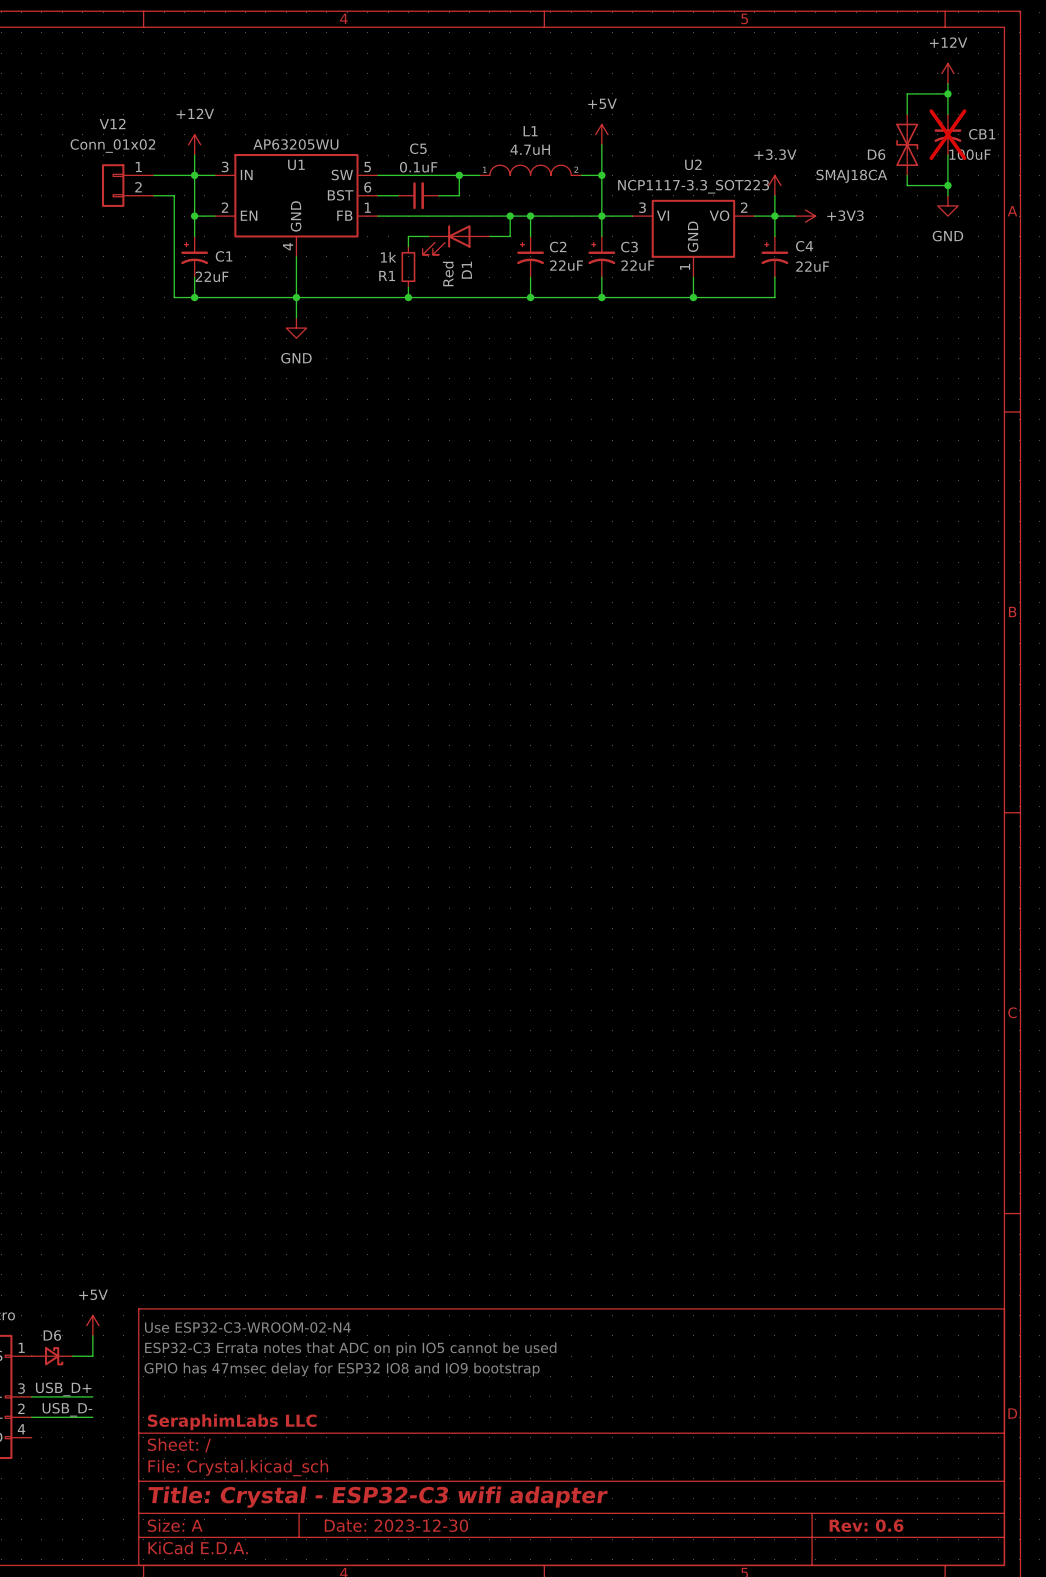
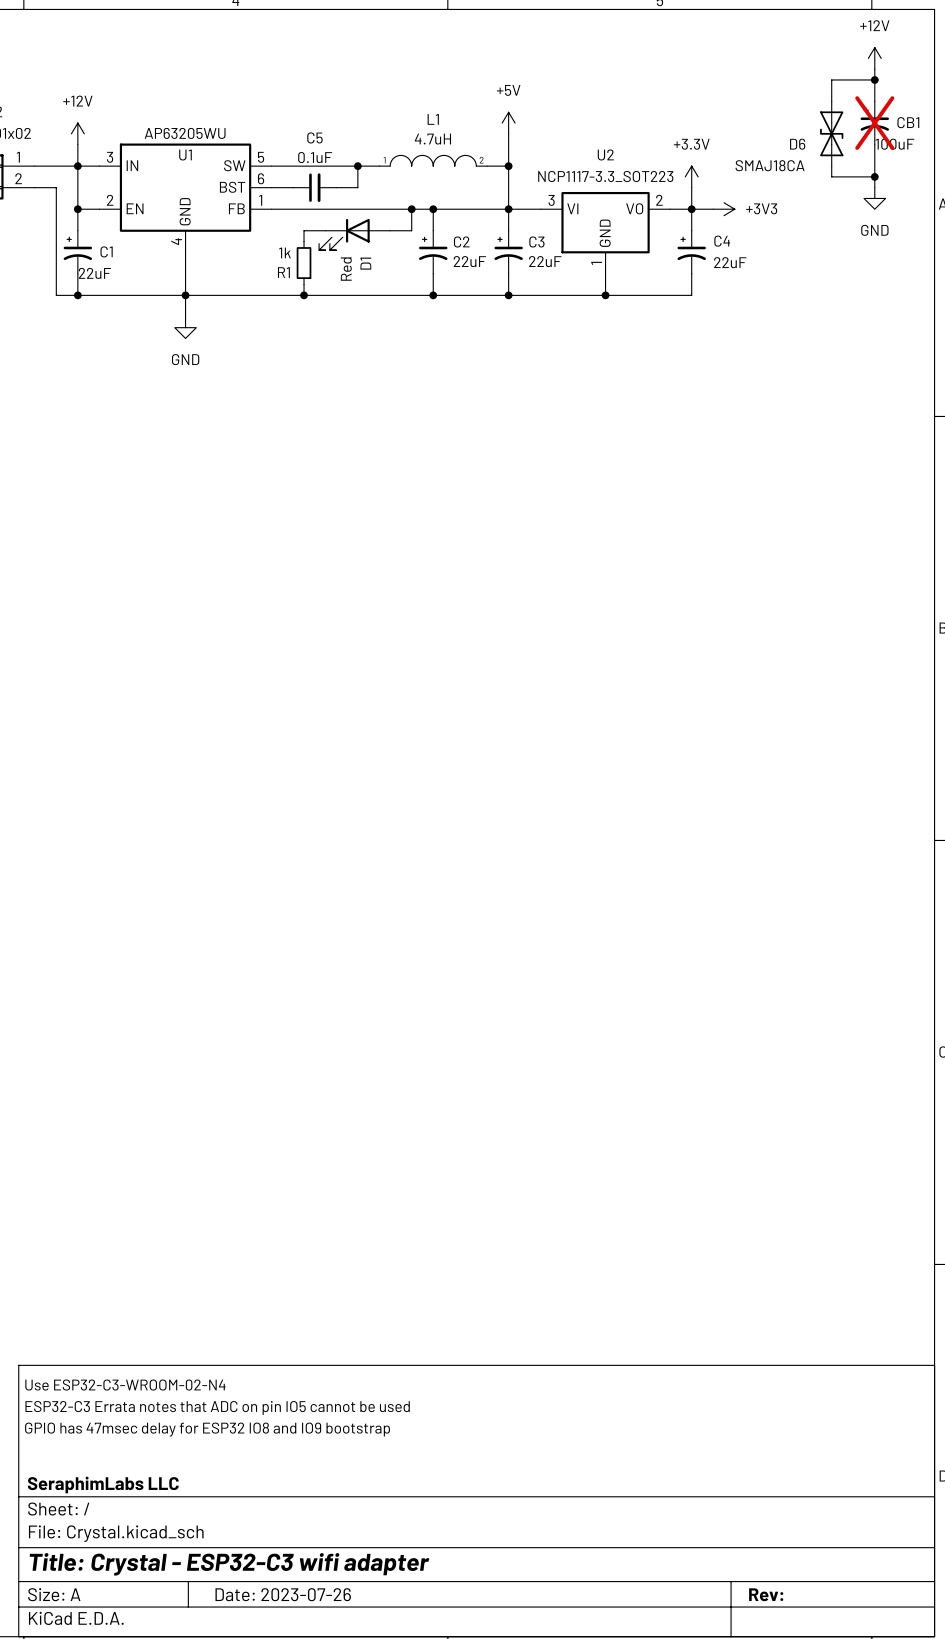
title block: Date: 2023-12-30 (396, 1525) -> Date: 2023-07-26 (283, 1594)
title block: Rev: 0.6 (866, 1525) -> Rev: (766, 1594)

